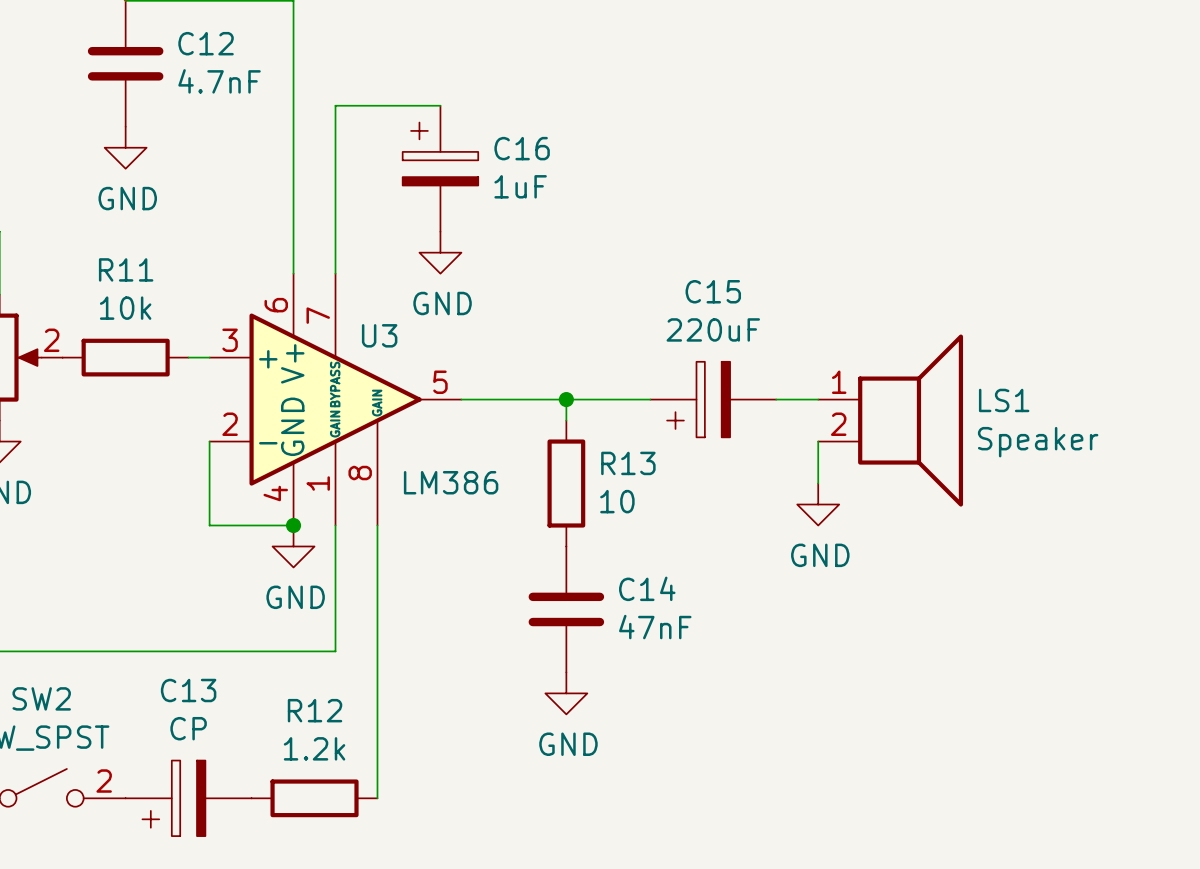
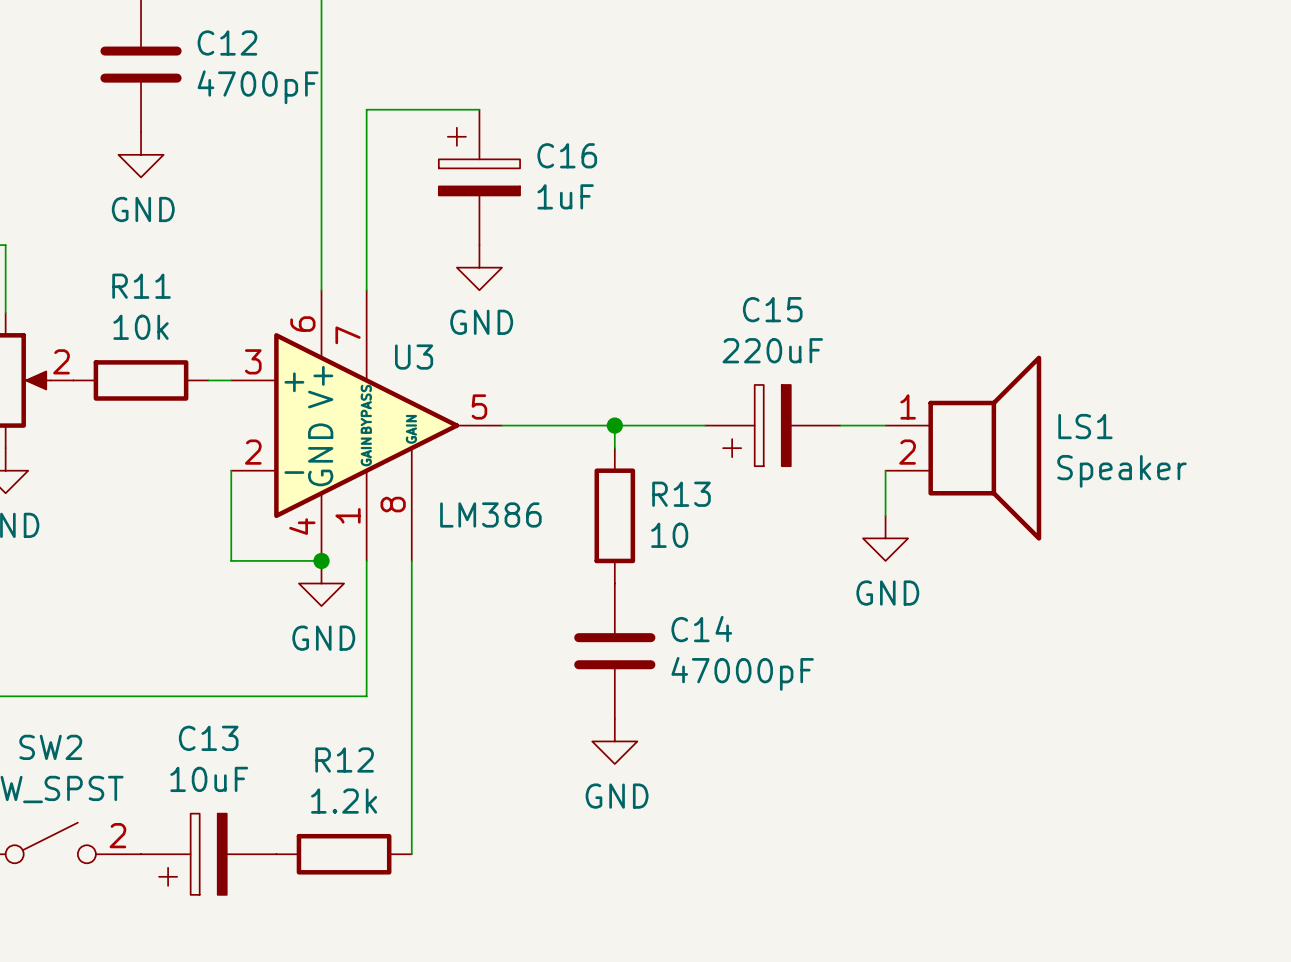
C12 value: 4.7nF (219, 81) -> 4700pF (258, 87)
C14 value: 47nF (655, 627) -> 47000pF (742, 673)
C13 value: CP (188, 728) -> 10uF (209, 779)

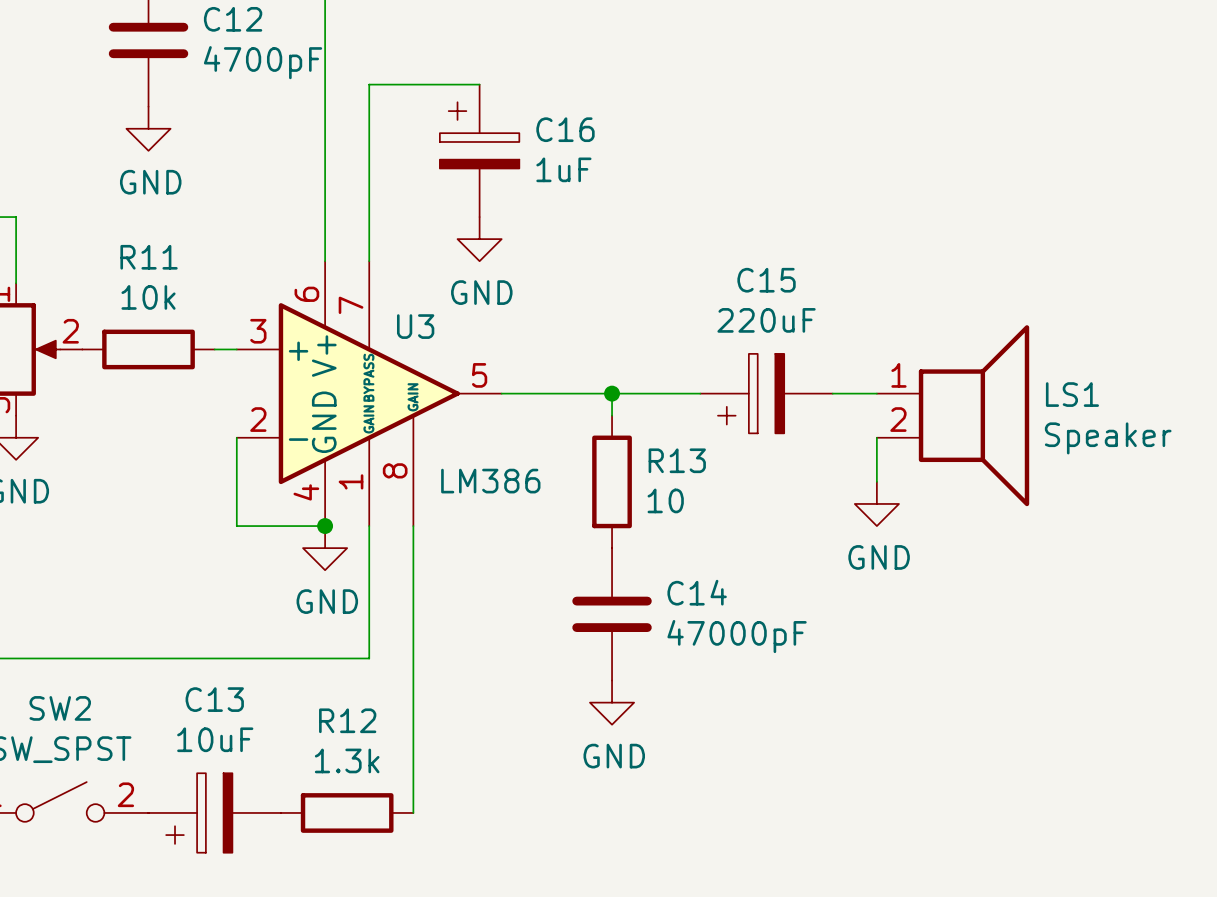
R12 value: 1.2k (344, 801) -> 1.3k (347, 760)

